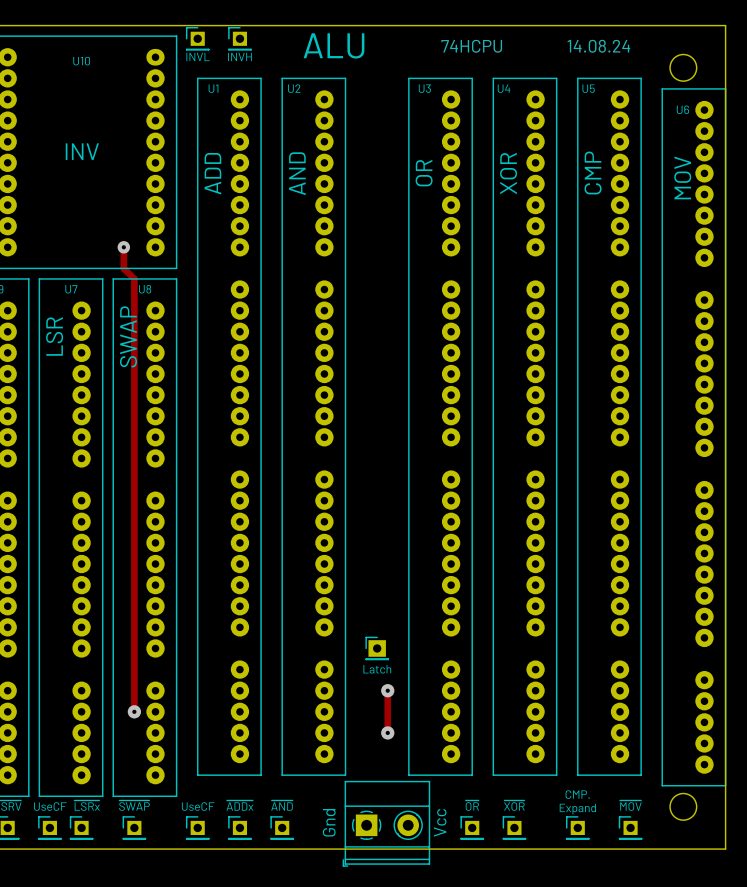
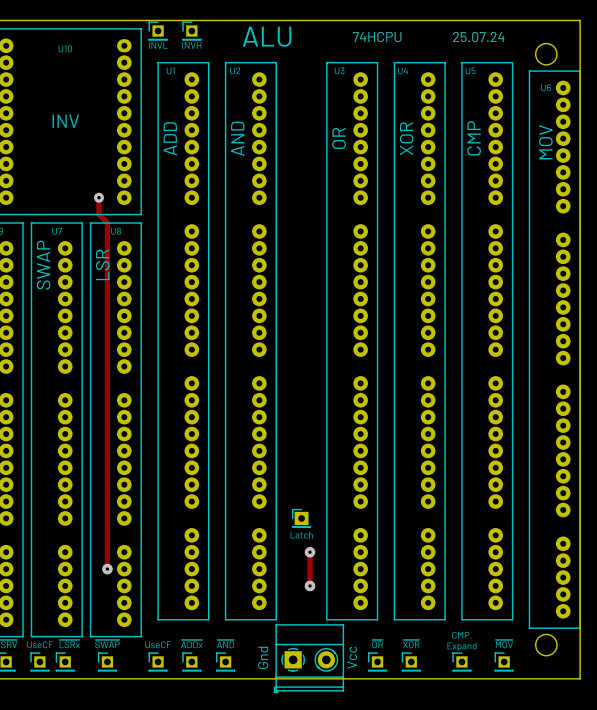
text: 14.08.24 (598, 46) -> none
text: none -> 25.07.24 (478, 36)
text: LSR (54, 336) -> SWAP (43, 265)
text: SWAP (128, 336) -> LSR (102, 264)

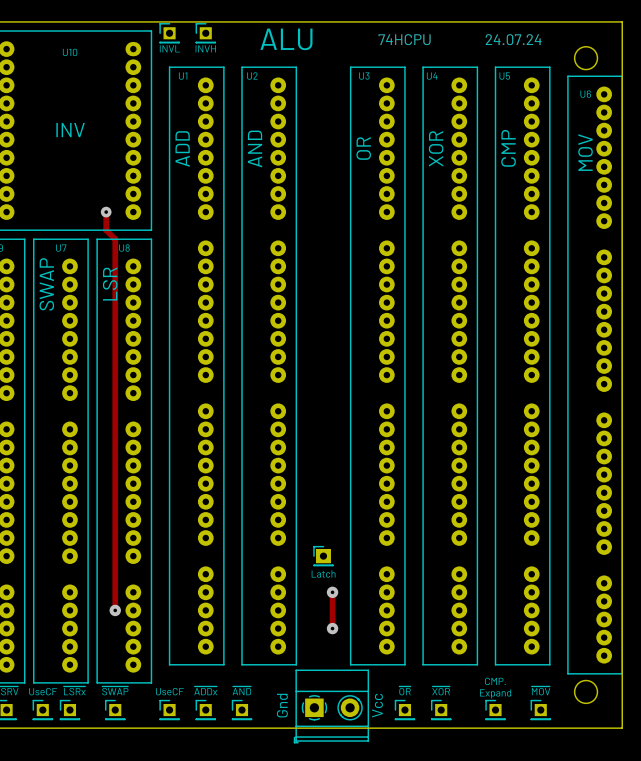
text: 25.07.24 (478, 36) -> none
text: none -> 24.07.24 (513, 39)

